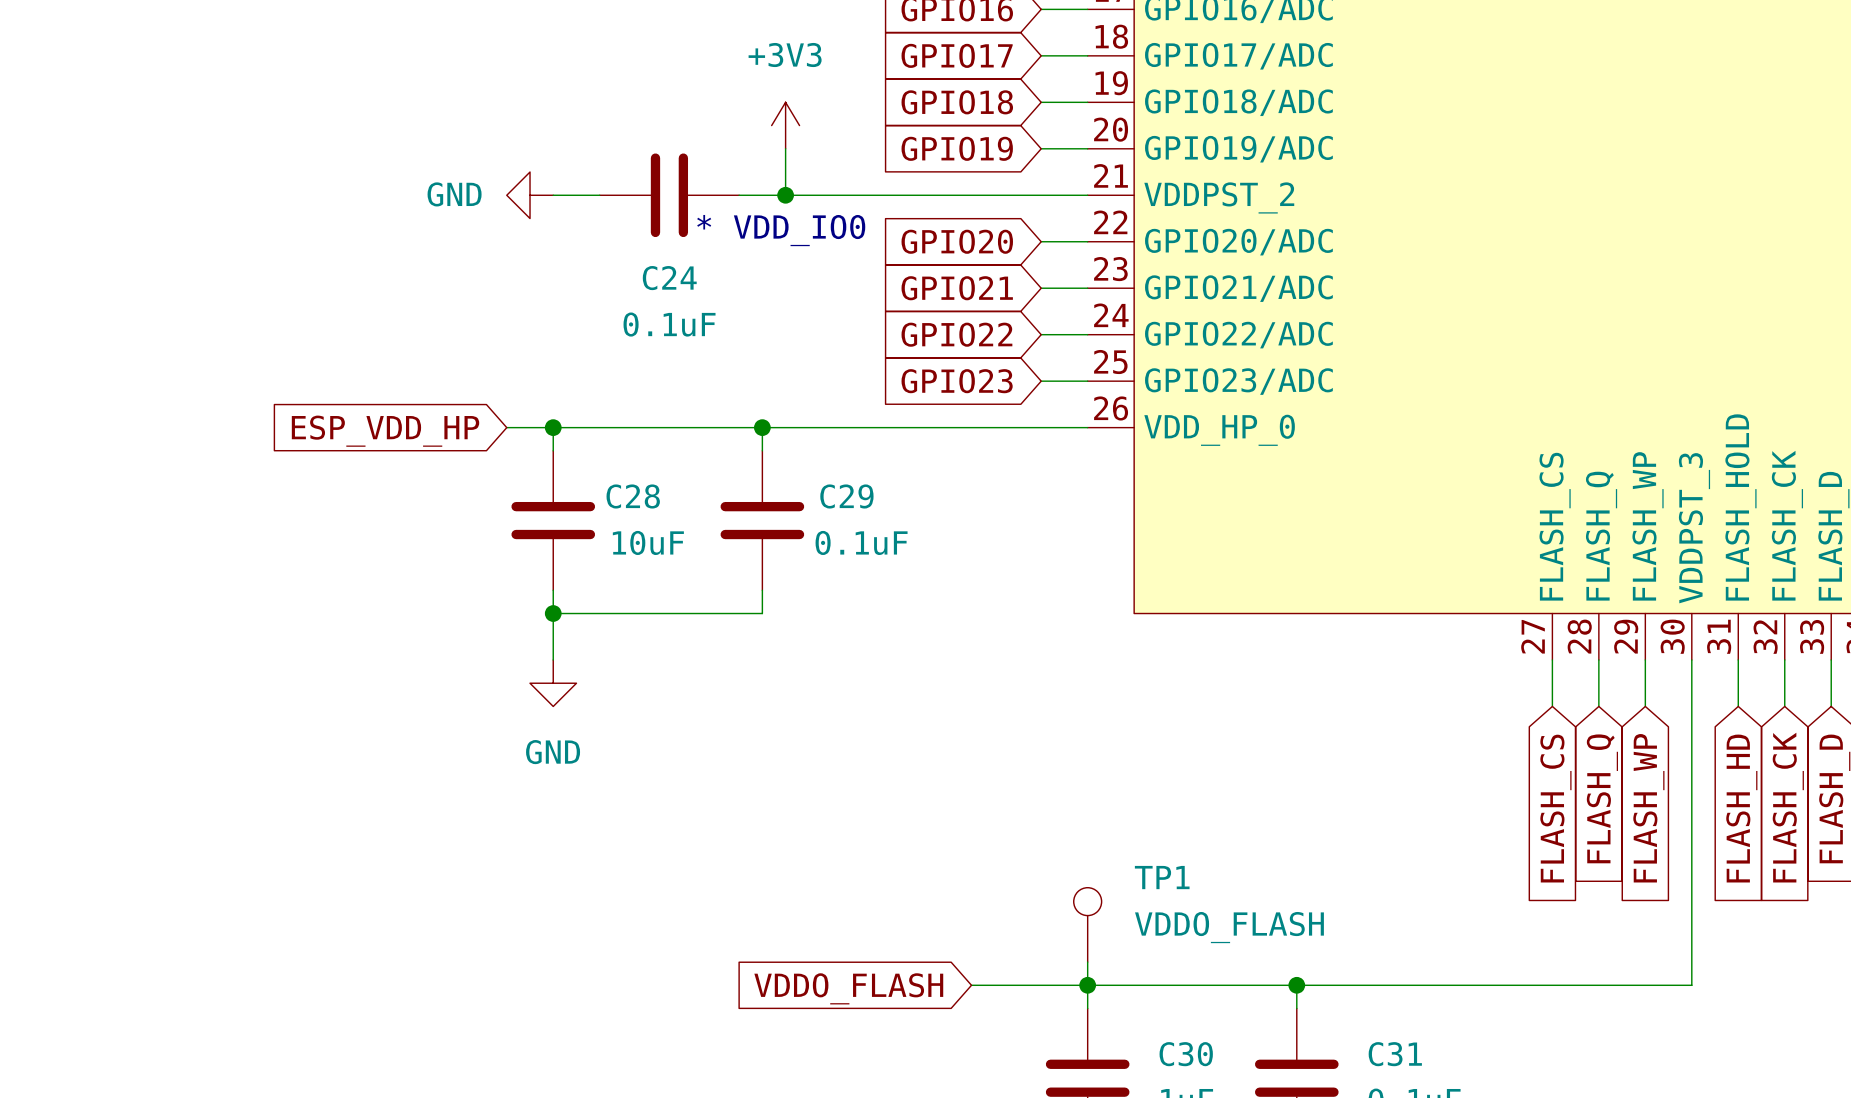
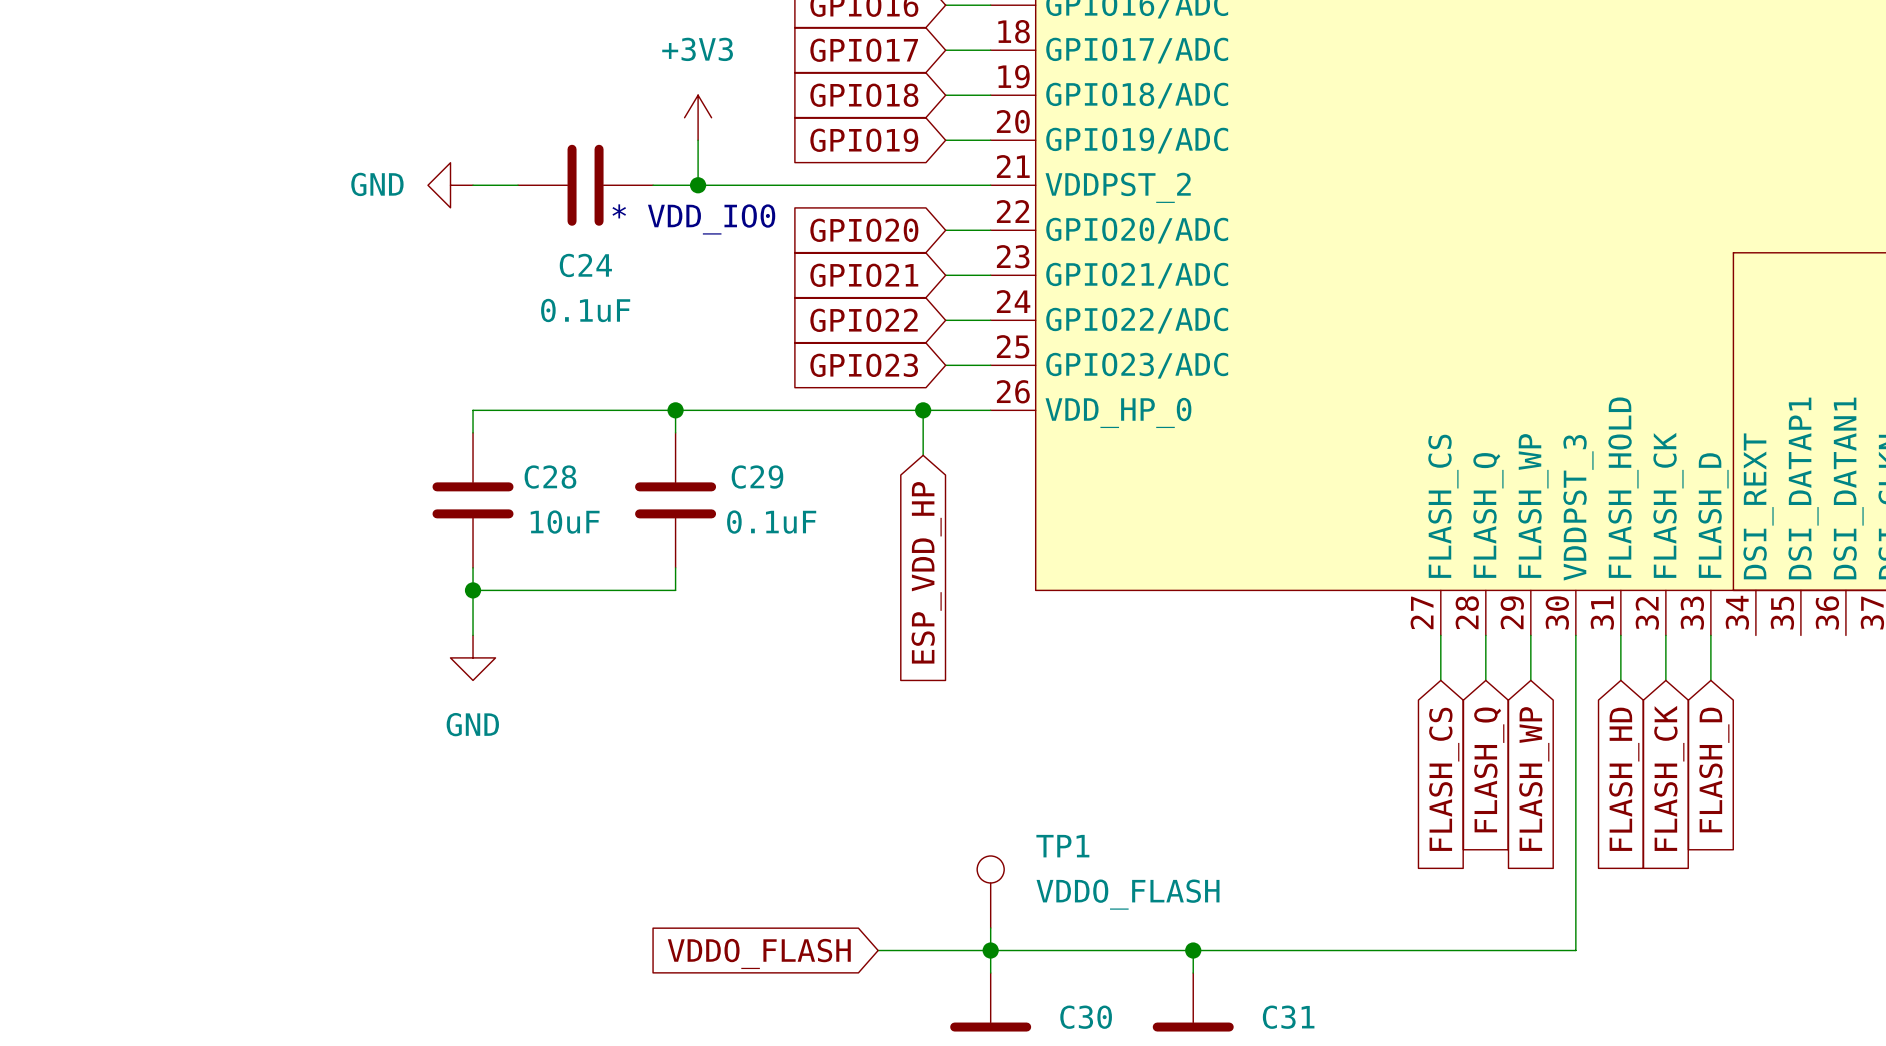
wire: (506, 427) (553, 427) -> none
junction: (553, 427) -> none
wire: none -> (923, 410) (923, 455)
junction: none -> (923, 410)
global label: ESP_VDD_HP (385, 431) -> none
global label: none -> ESP_VDD_HP (926, 572)

